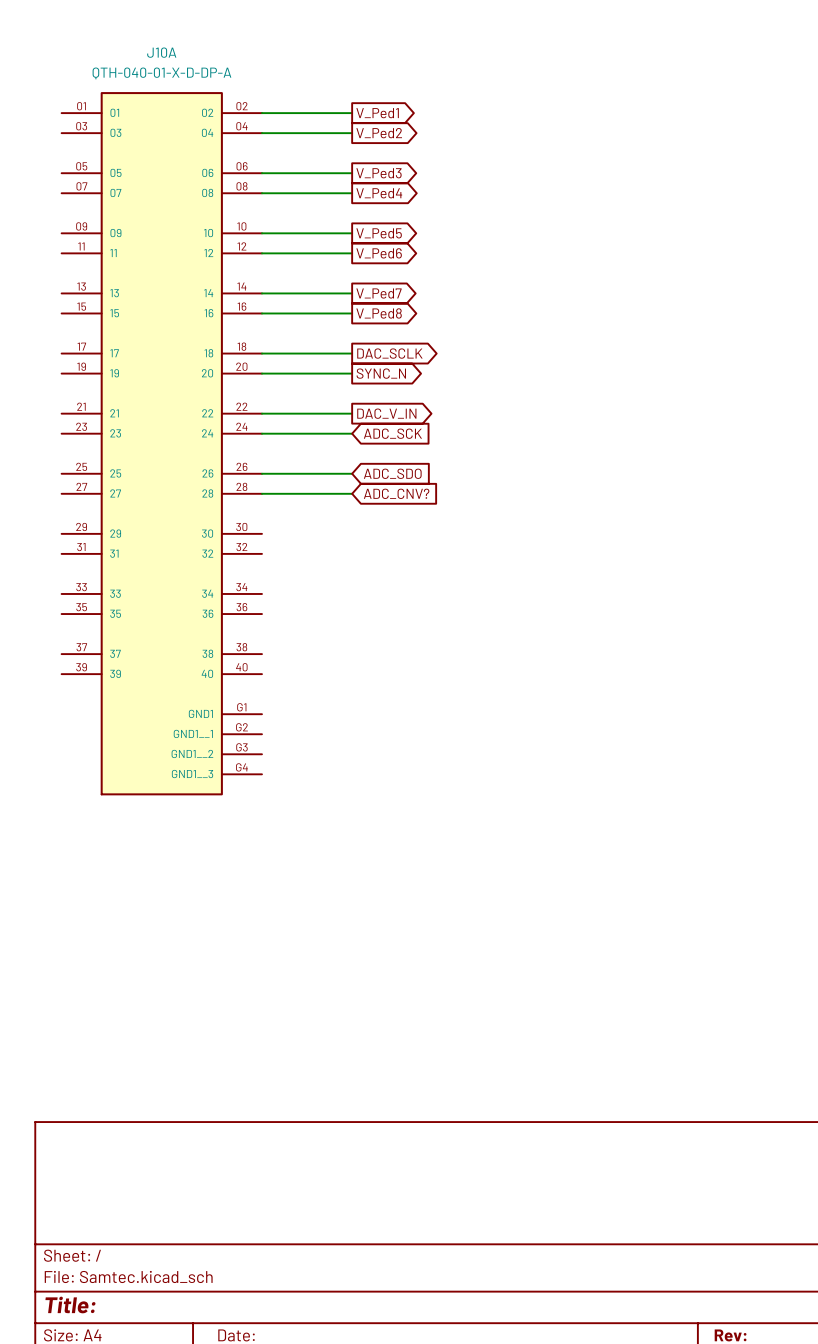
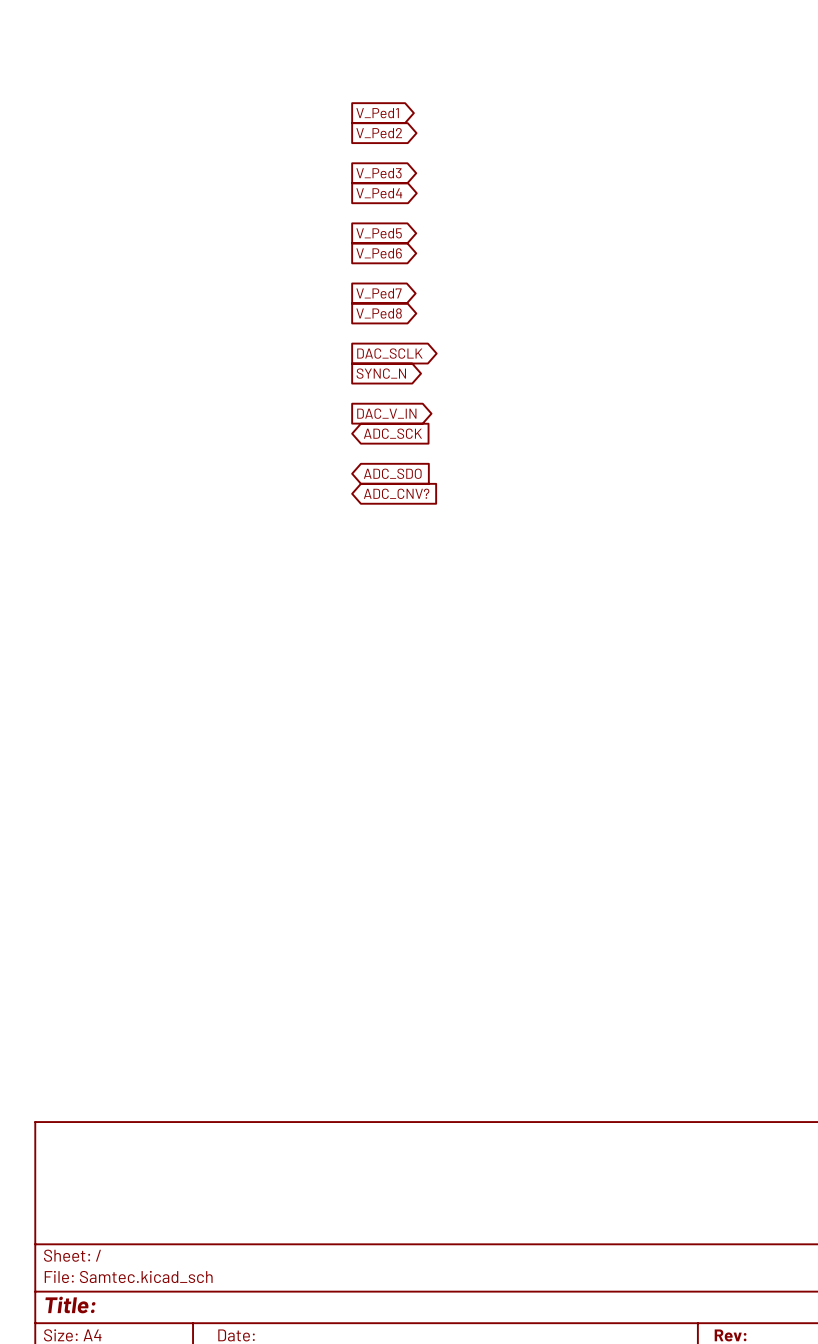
wire: (261, 113) (352, 113) -> none
wire: (261, 133) (352, 133) -> none
wire: (261, 173) (352, 173) -> none
wire: (261, 193) (352, 193) -> none
wire: (261, 233) (352, 233) -> none
wire: (261, 253) (352, 253) -> none
wire: (261, 293) (352, 293) -> none
wire: (261, 313) (352, 313) -> none
wire: (261, 353) (352, 353) -> none
wire: (261, 373) (352, 373) -> none
wire: (261, 413) (352, 413) -> none
wire: (261, 433) (352, 433) -> none
J10A: QTH-040-01-X-D-DP-A (161, 443) -> none
wire: (261, 473) (352, 473) -> none
wire: (261, 493) (352, 493) -> none

